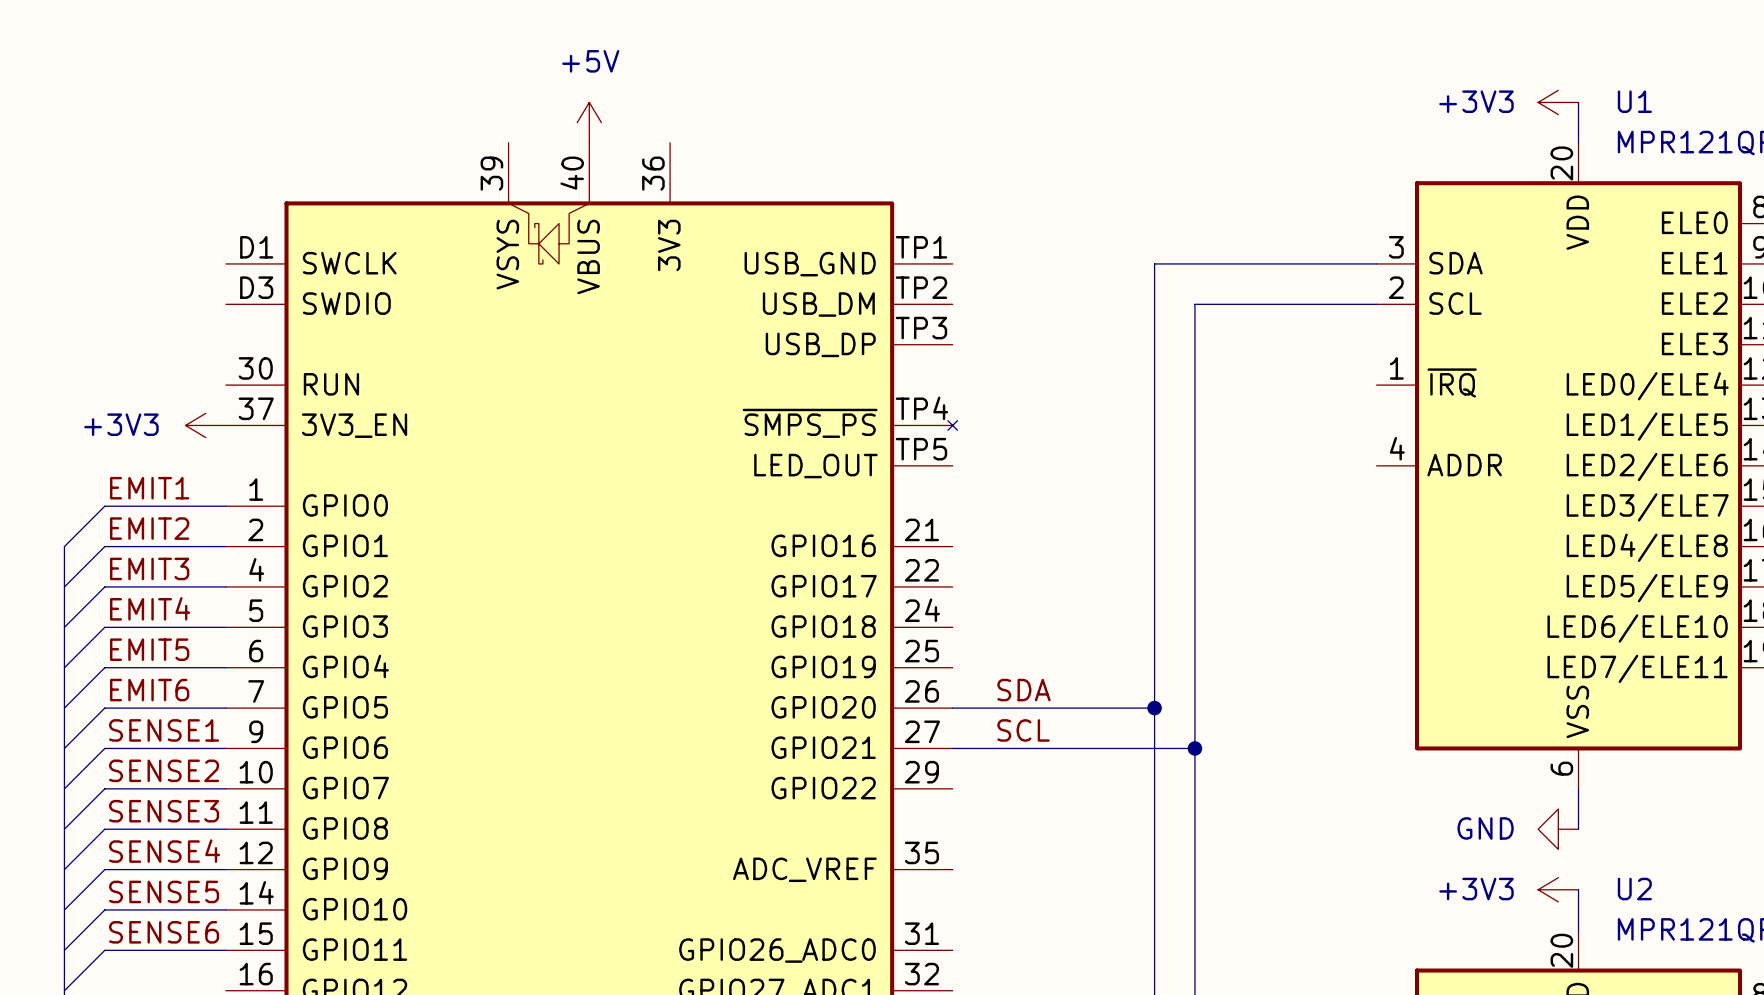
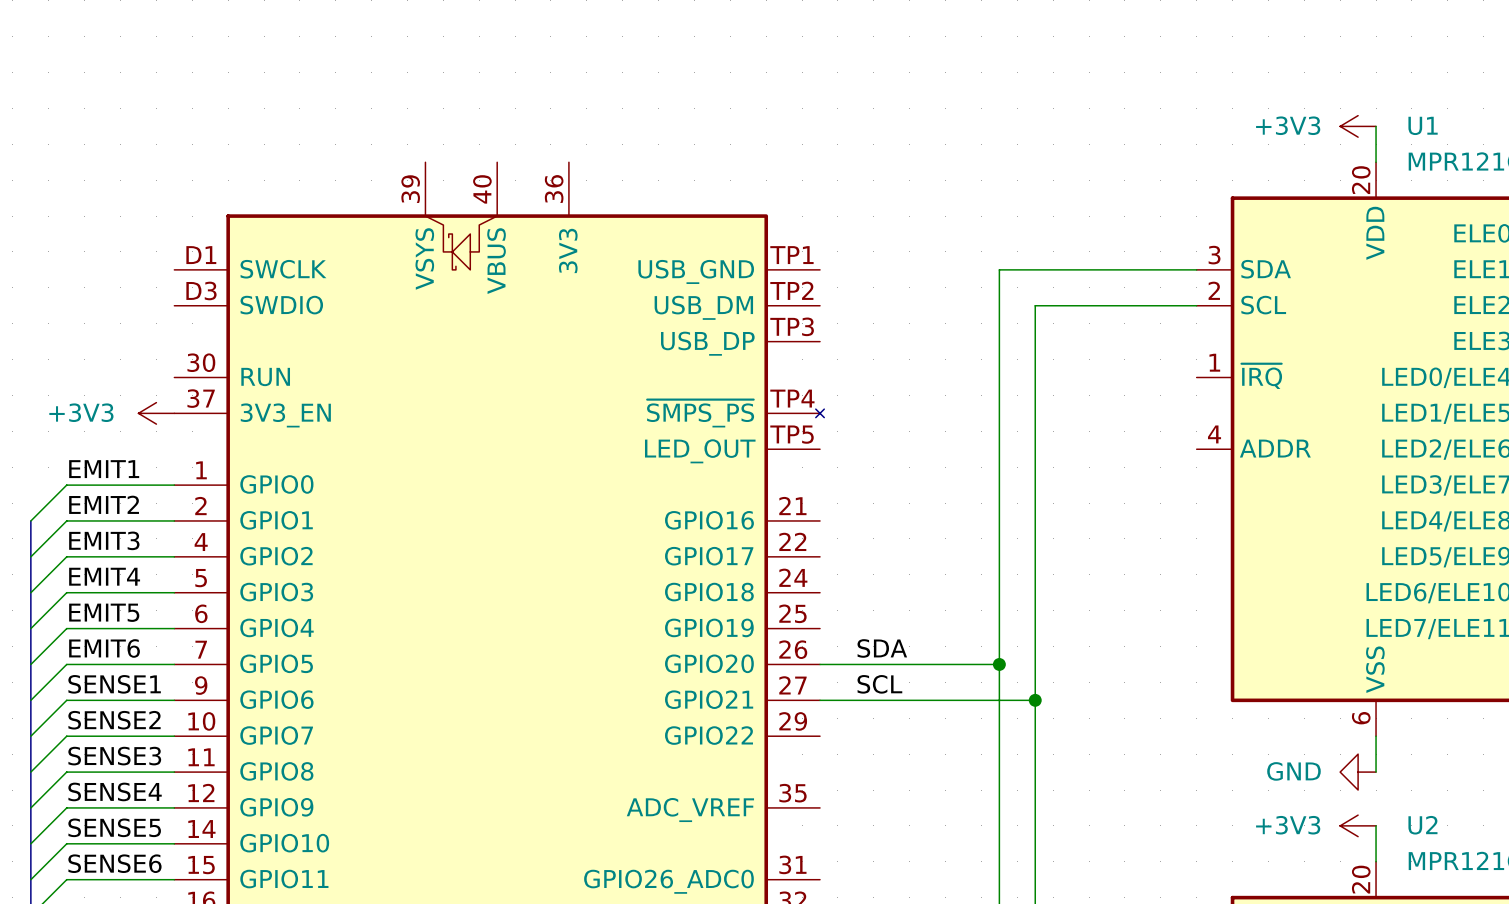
power symbol: +5V (589, 122) -> none

